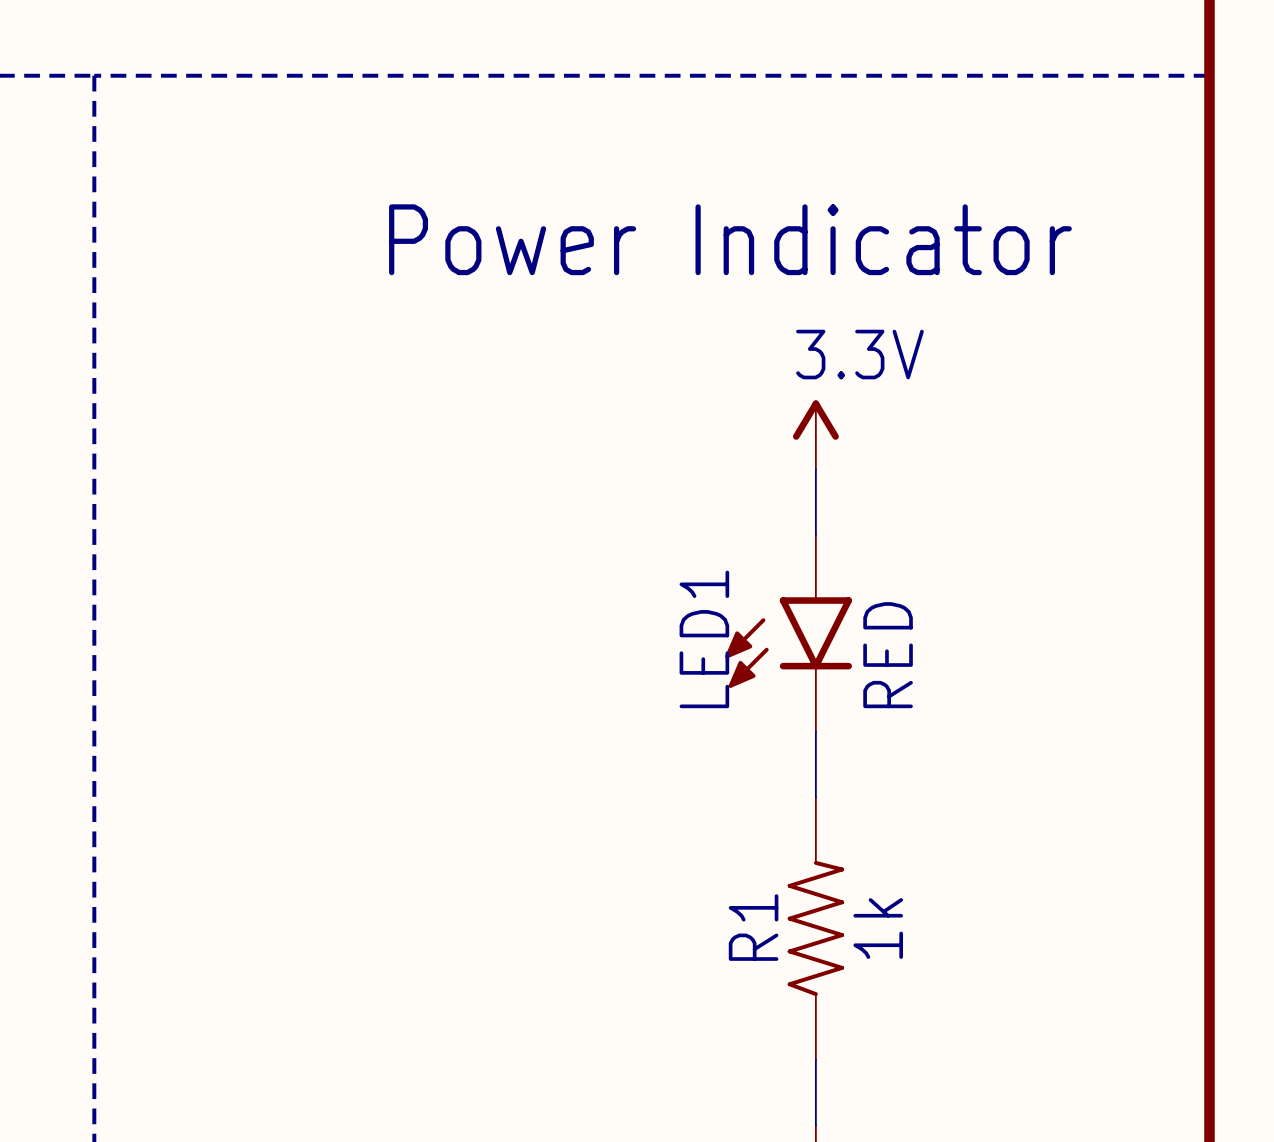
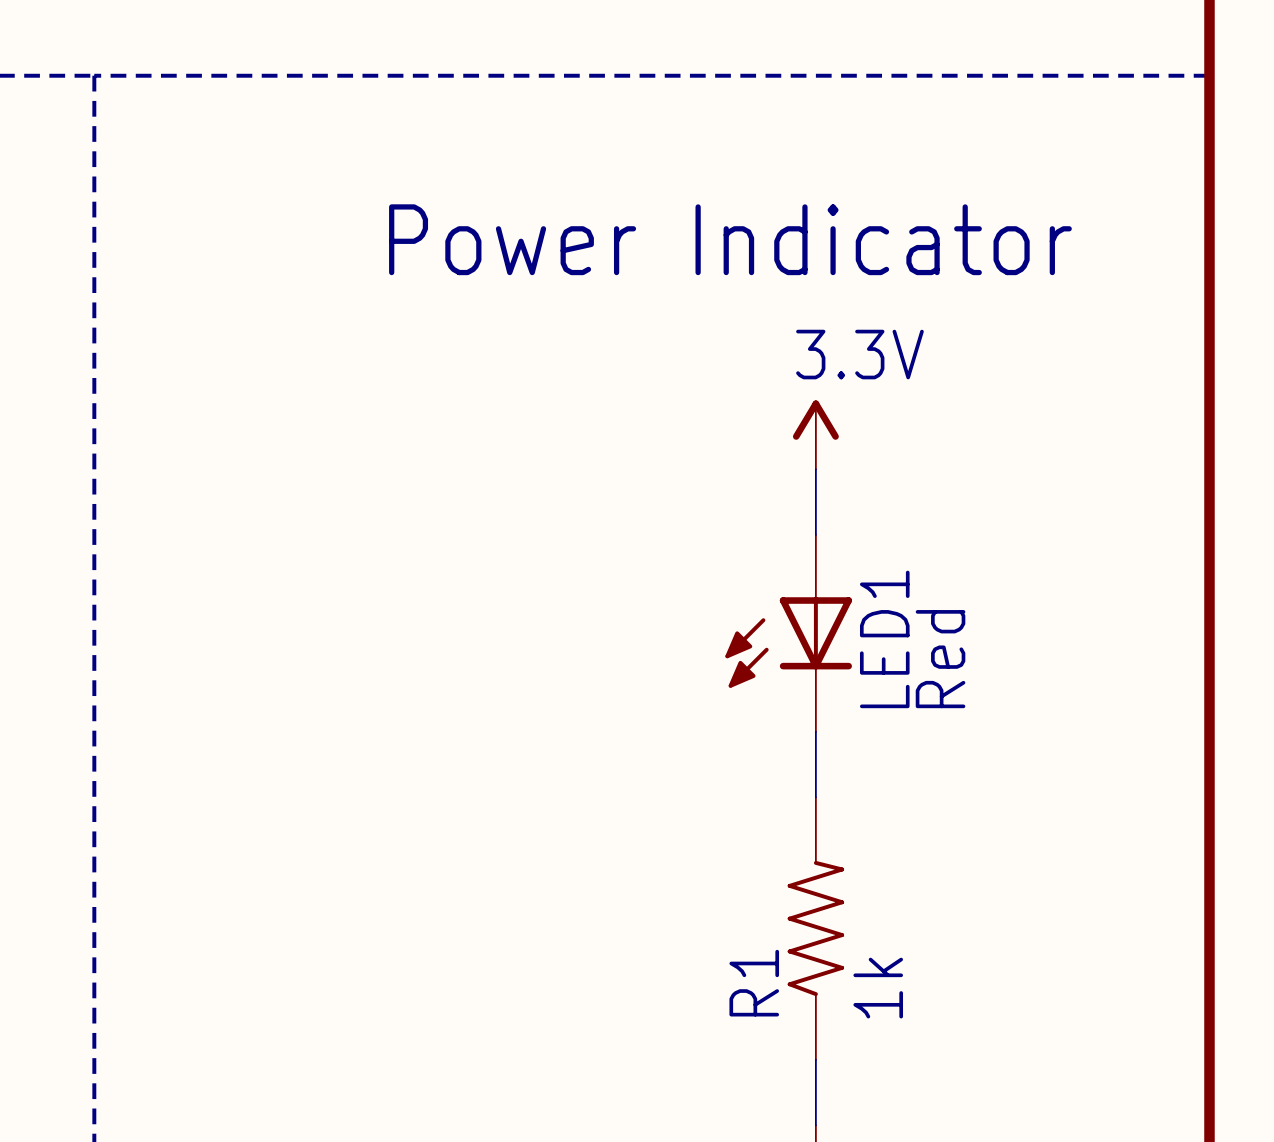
LED1 symbol: [725, 534, 852, 732] -> [725, 534, 852, 732]
LED1 name position: LED1 (704, 639) -> LED1 (884, 639)
LED1 value: RED (888, 655) -> Red (940, 659)
R1 name position: R1 (753, 927) -> R1 (754, 983)
R1 value position: 1k (878, 928) -> 1k (878, 988)

